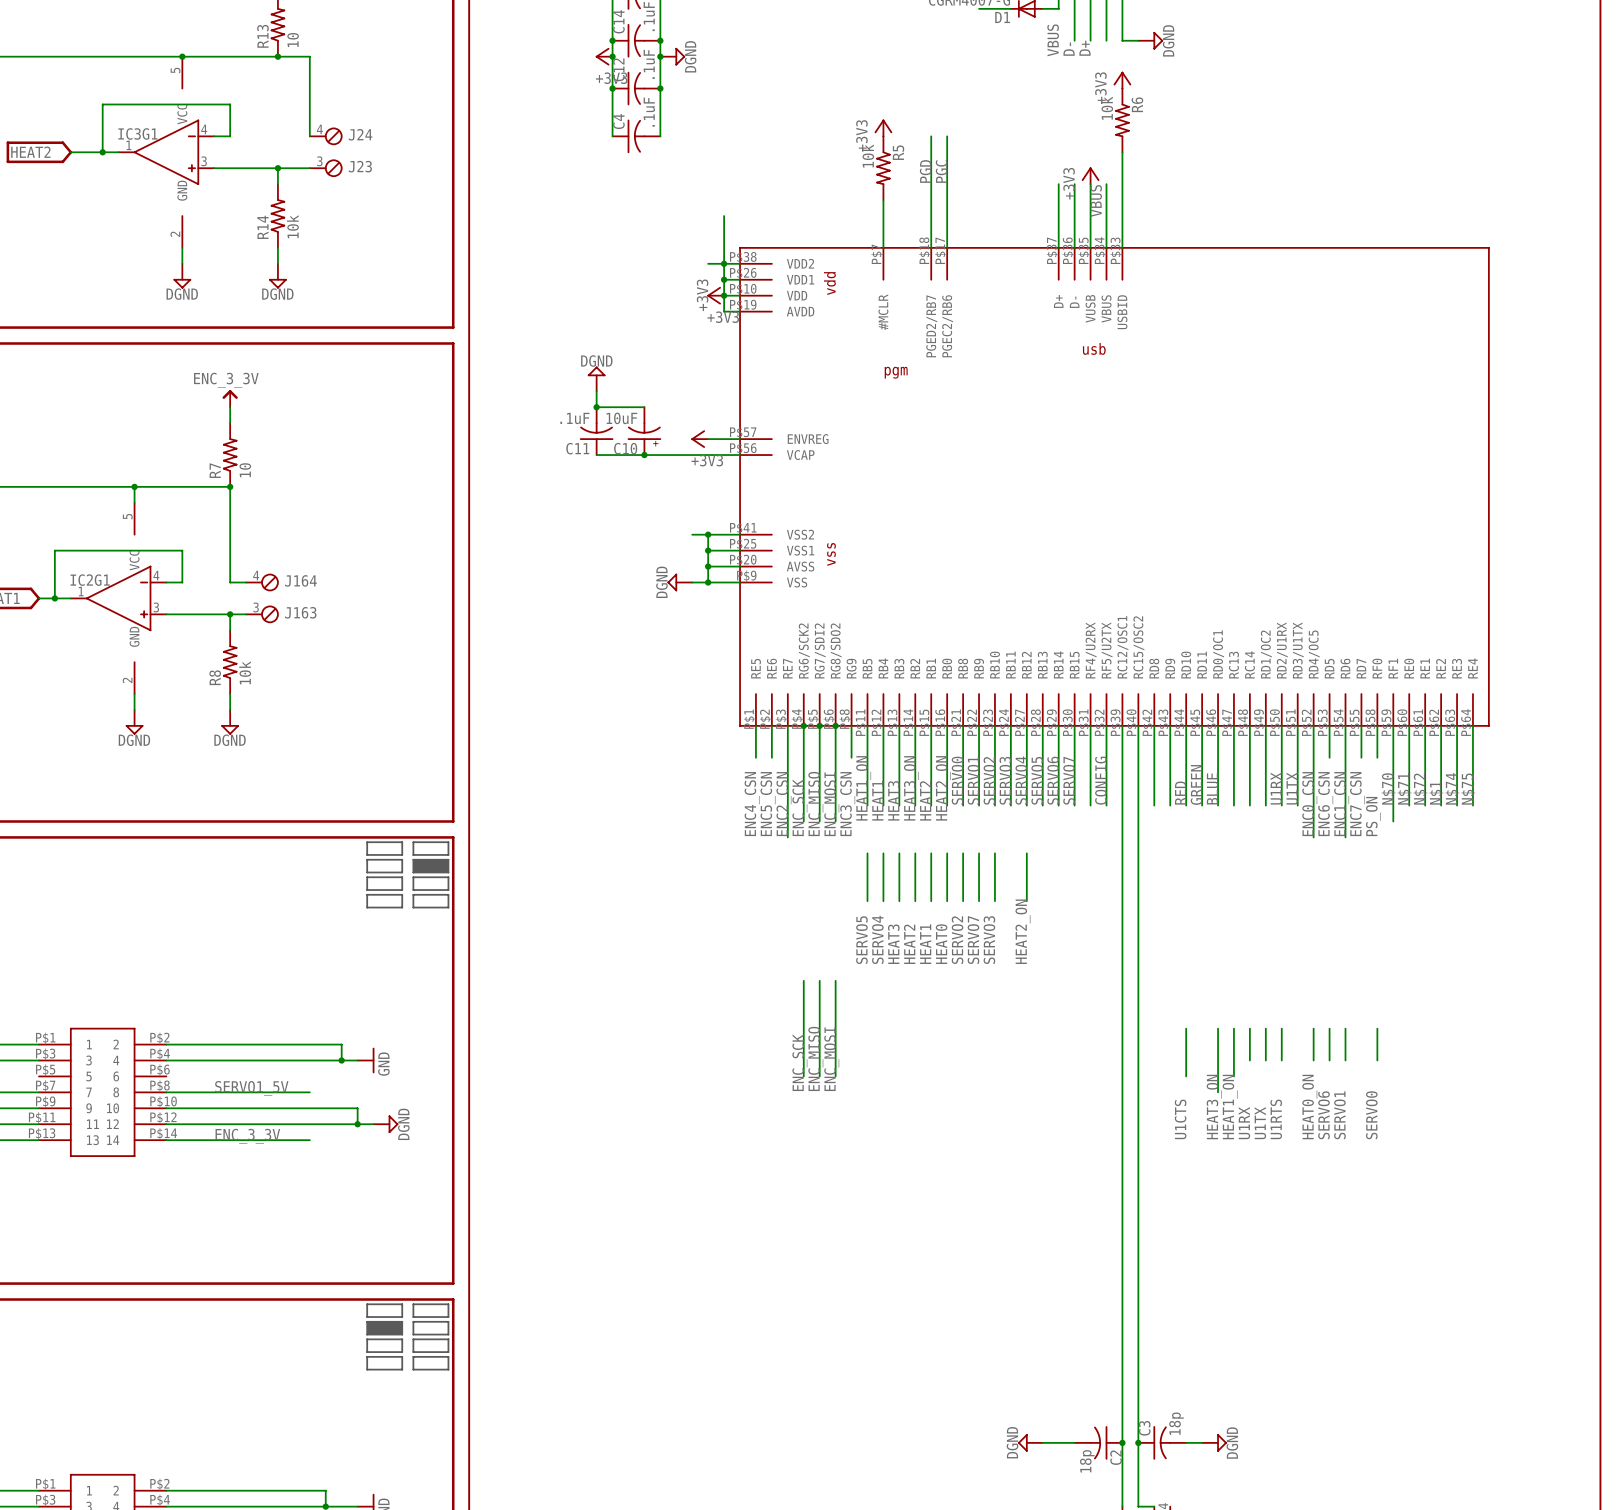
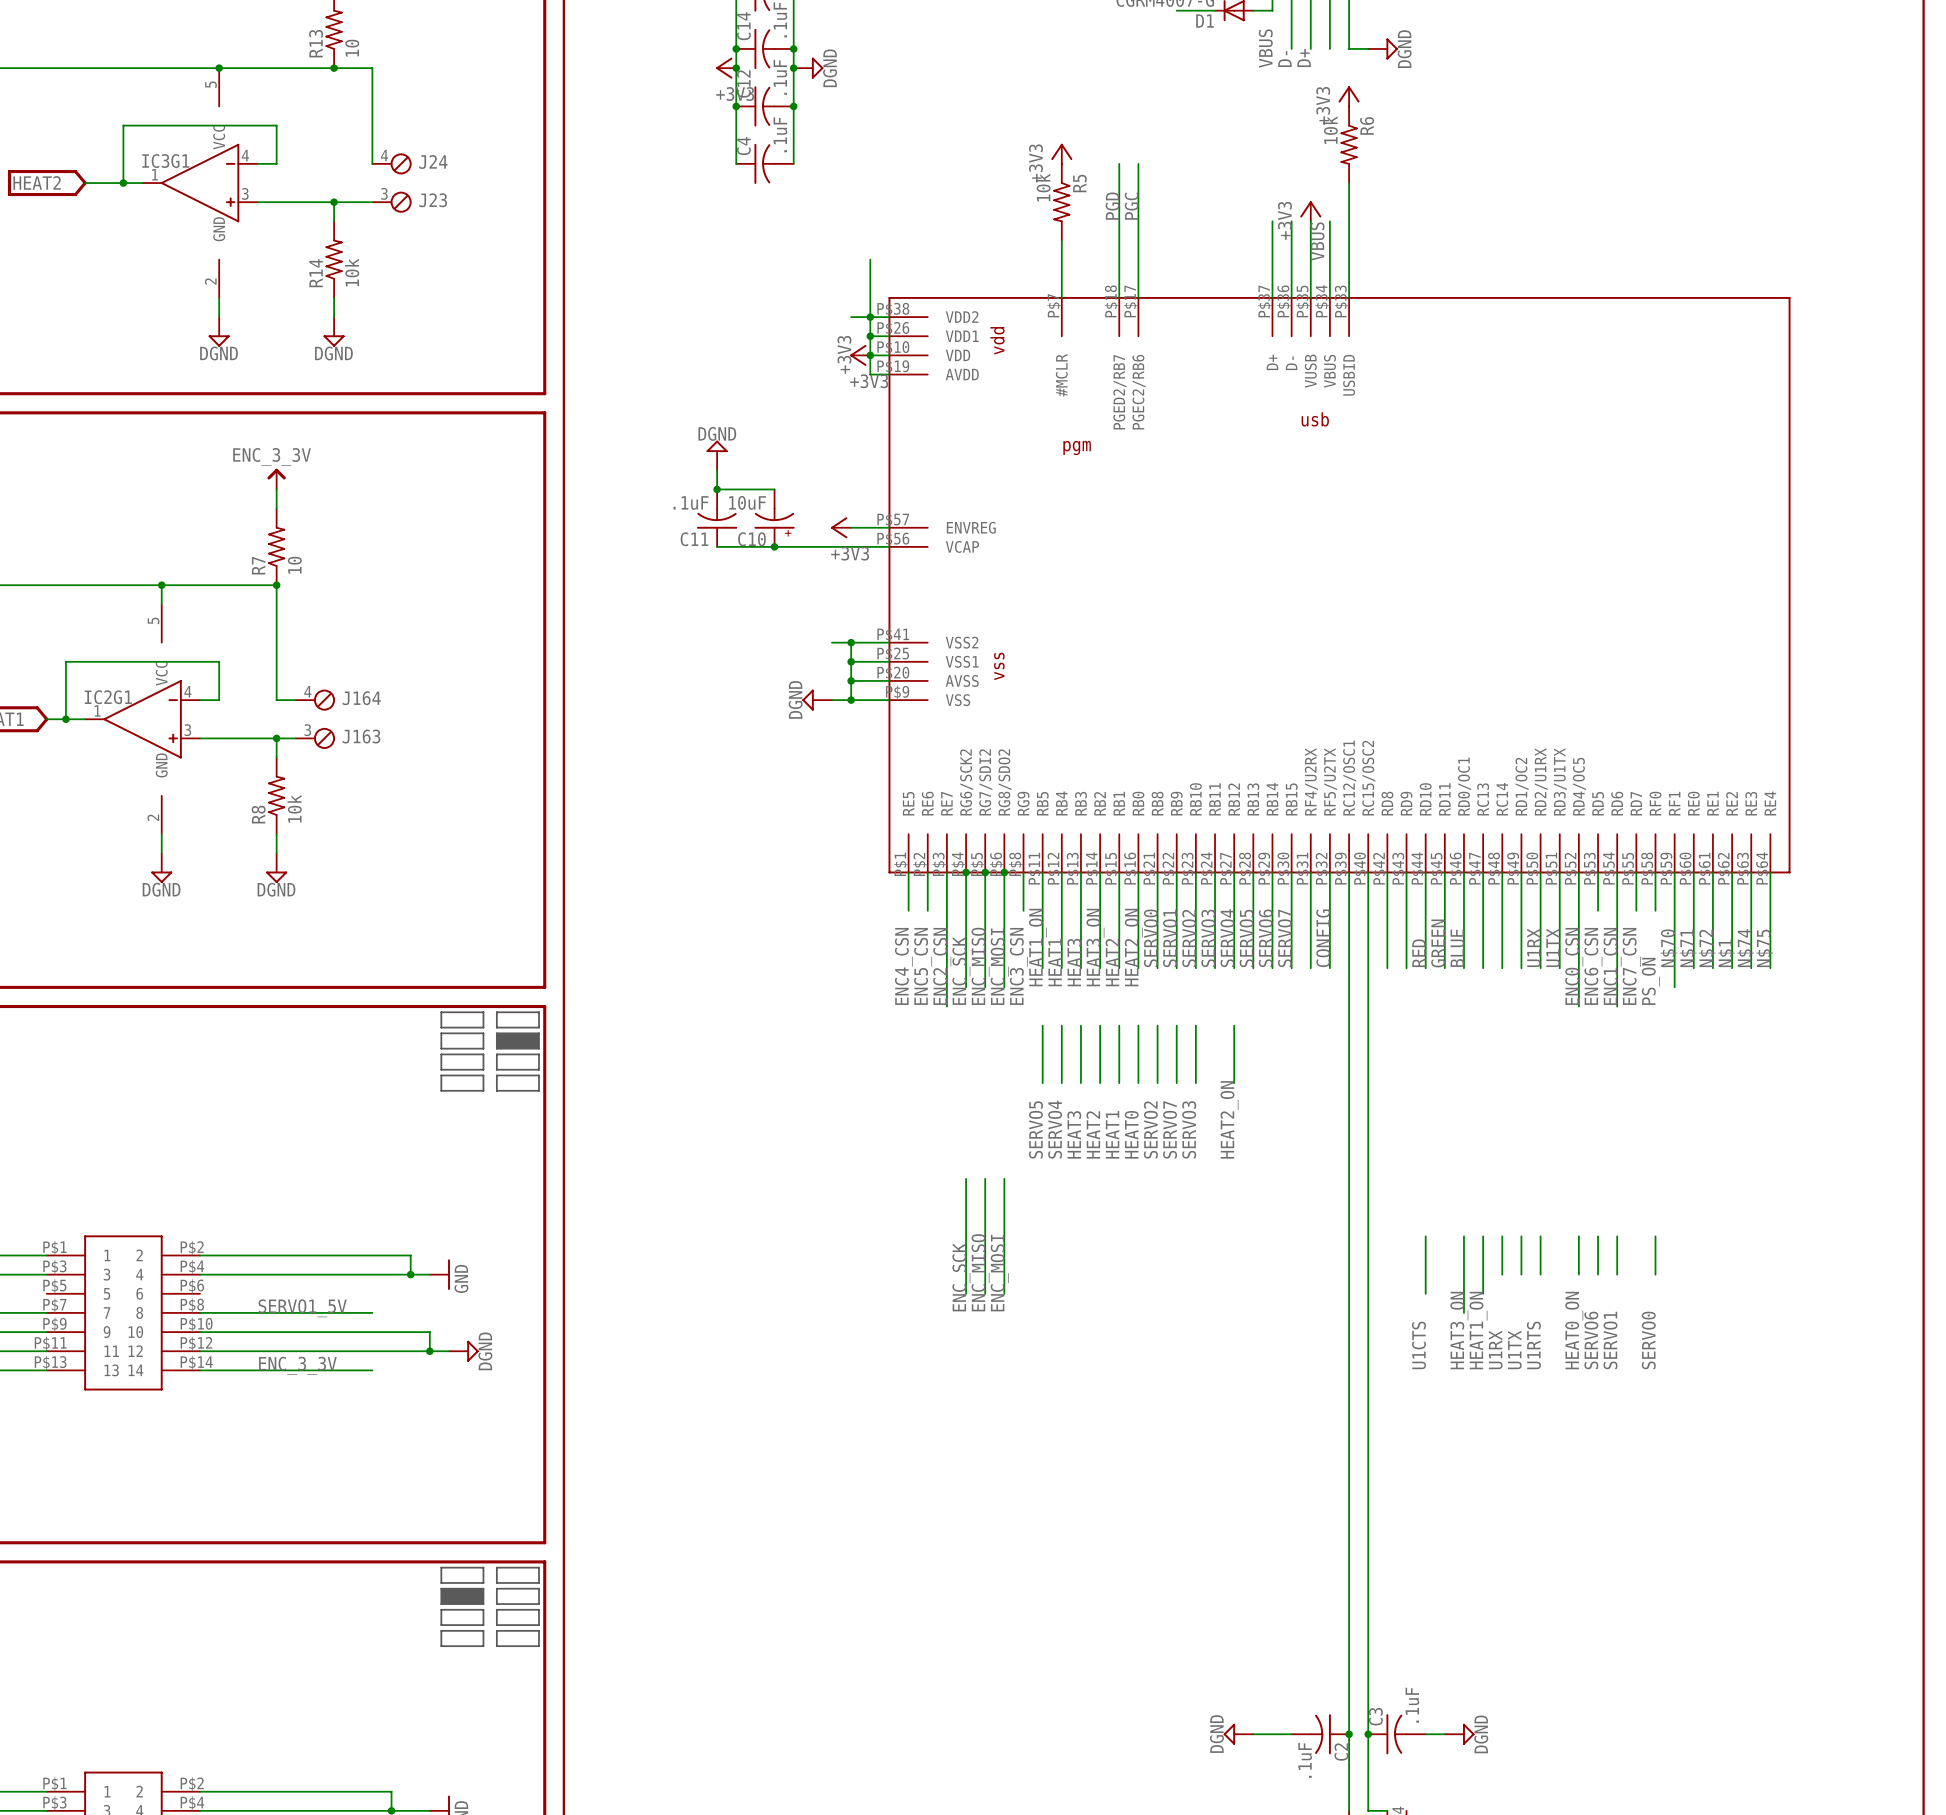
C3 value: 18p (1176, 1423) -> .1uF (1412, 1705)
C2 value: 18p (1087, 1461) -> .1uF (1305, 1760)

